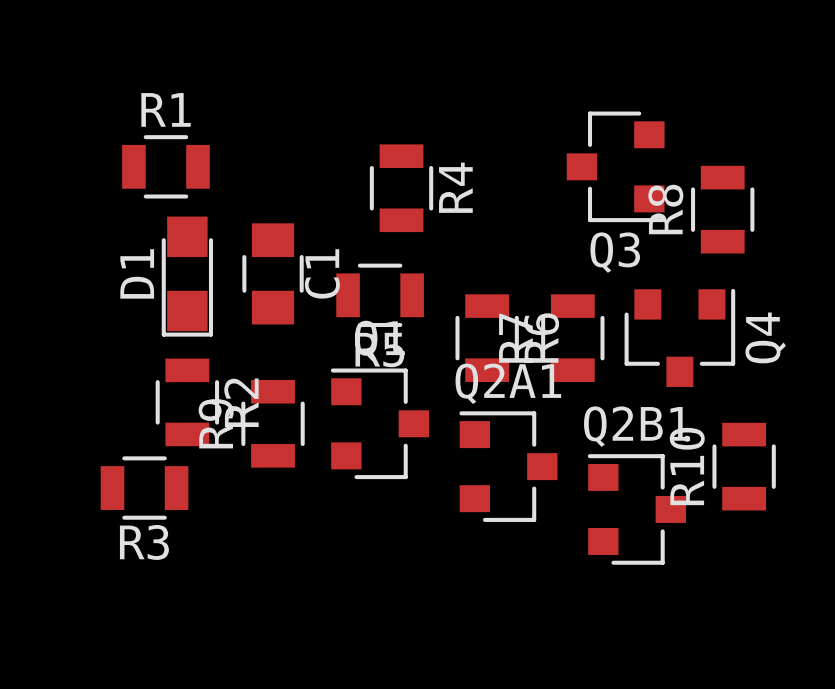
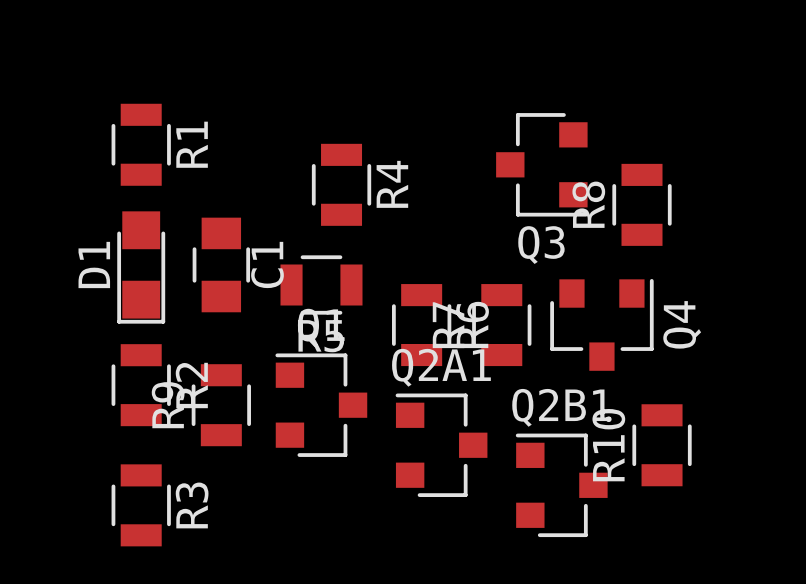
R1 rotation: 0° (165, 166) -> 90° clockwise (141, 144)
R3 rotation: 0° (144, 488) -> 90° clockwise (141, 505)
R3 position: (144, 488) -> (141, 505)
R3 name position: R3 (144, 542) -> R3 (192, 505)

